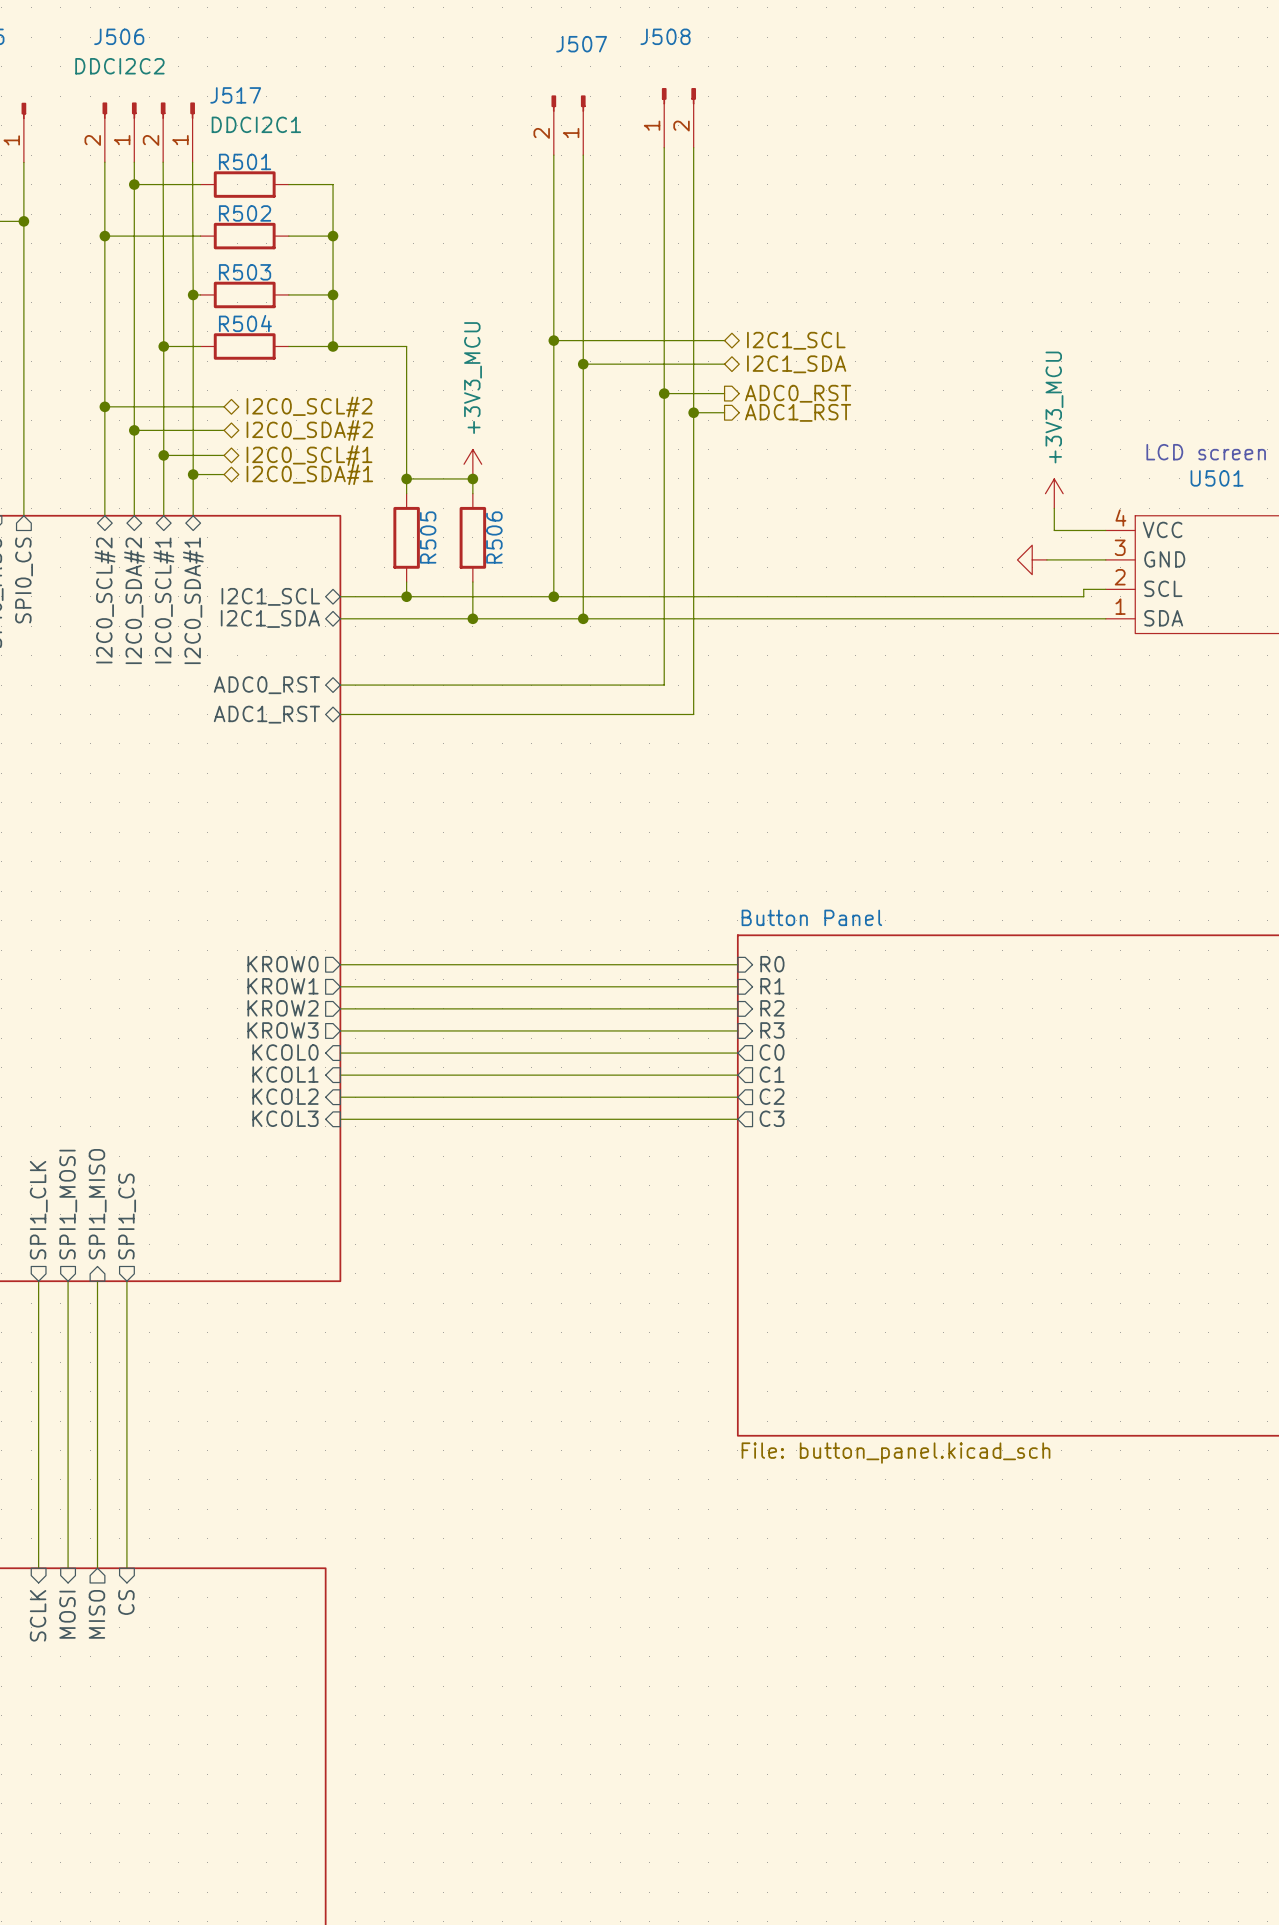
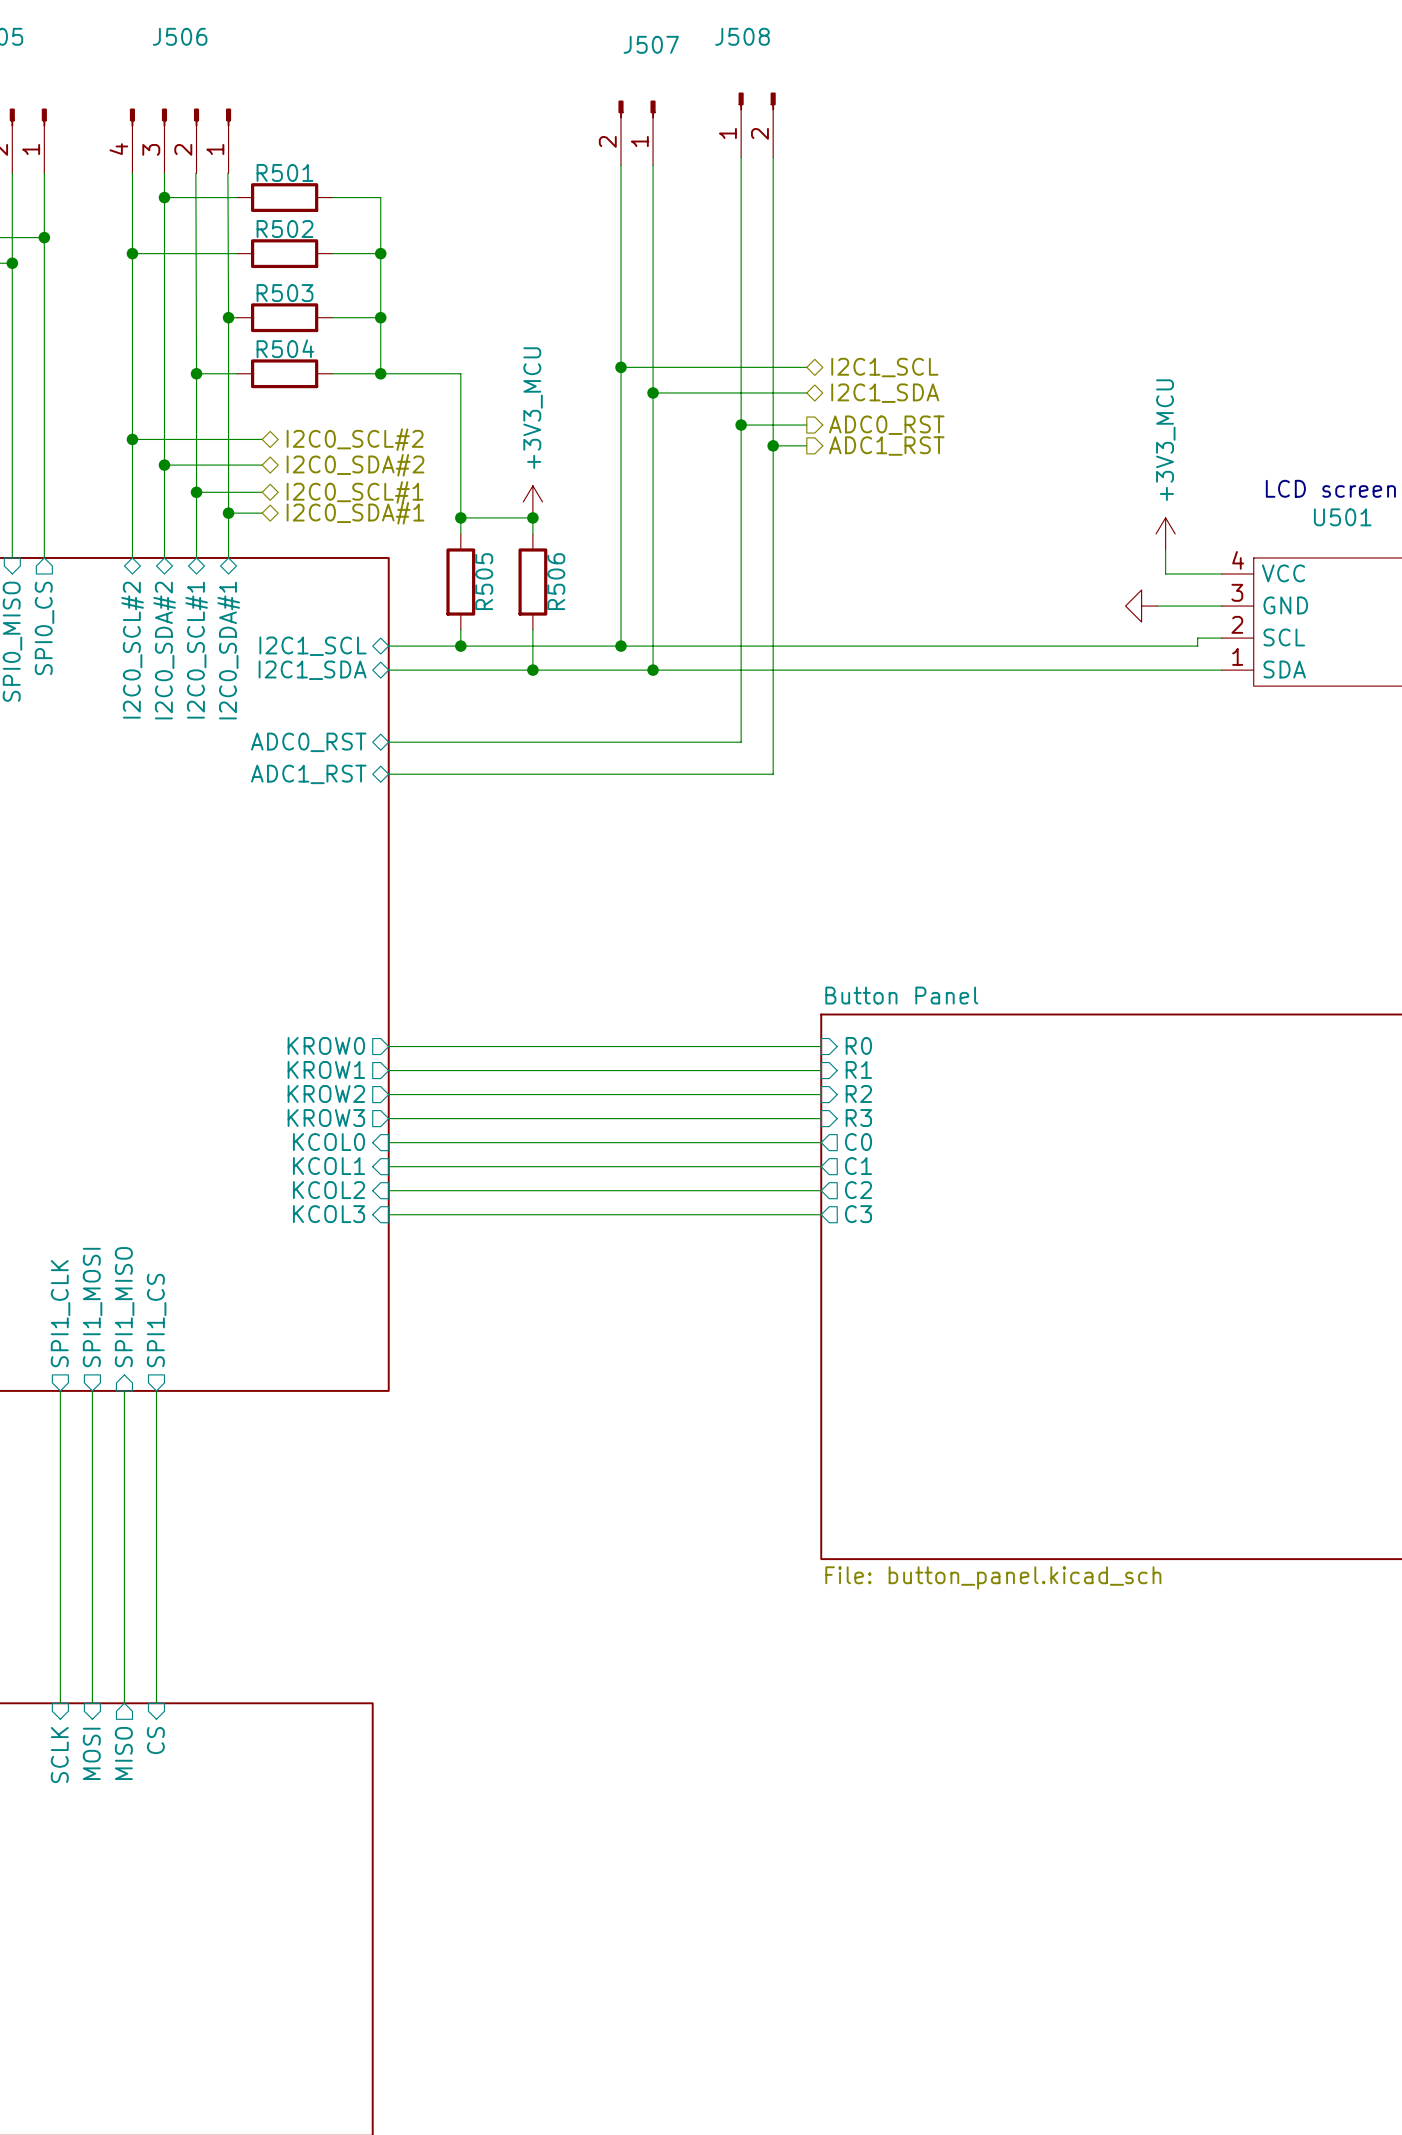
J506 value: DDCI2C2 (119, 66) -> none
J506 symbol: [102, 102, 137, 163] -> [129, 108, 232, 174]
J517: DDCI2C1 (177, 132) -> none

